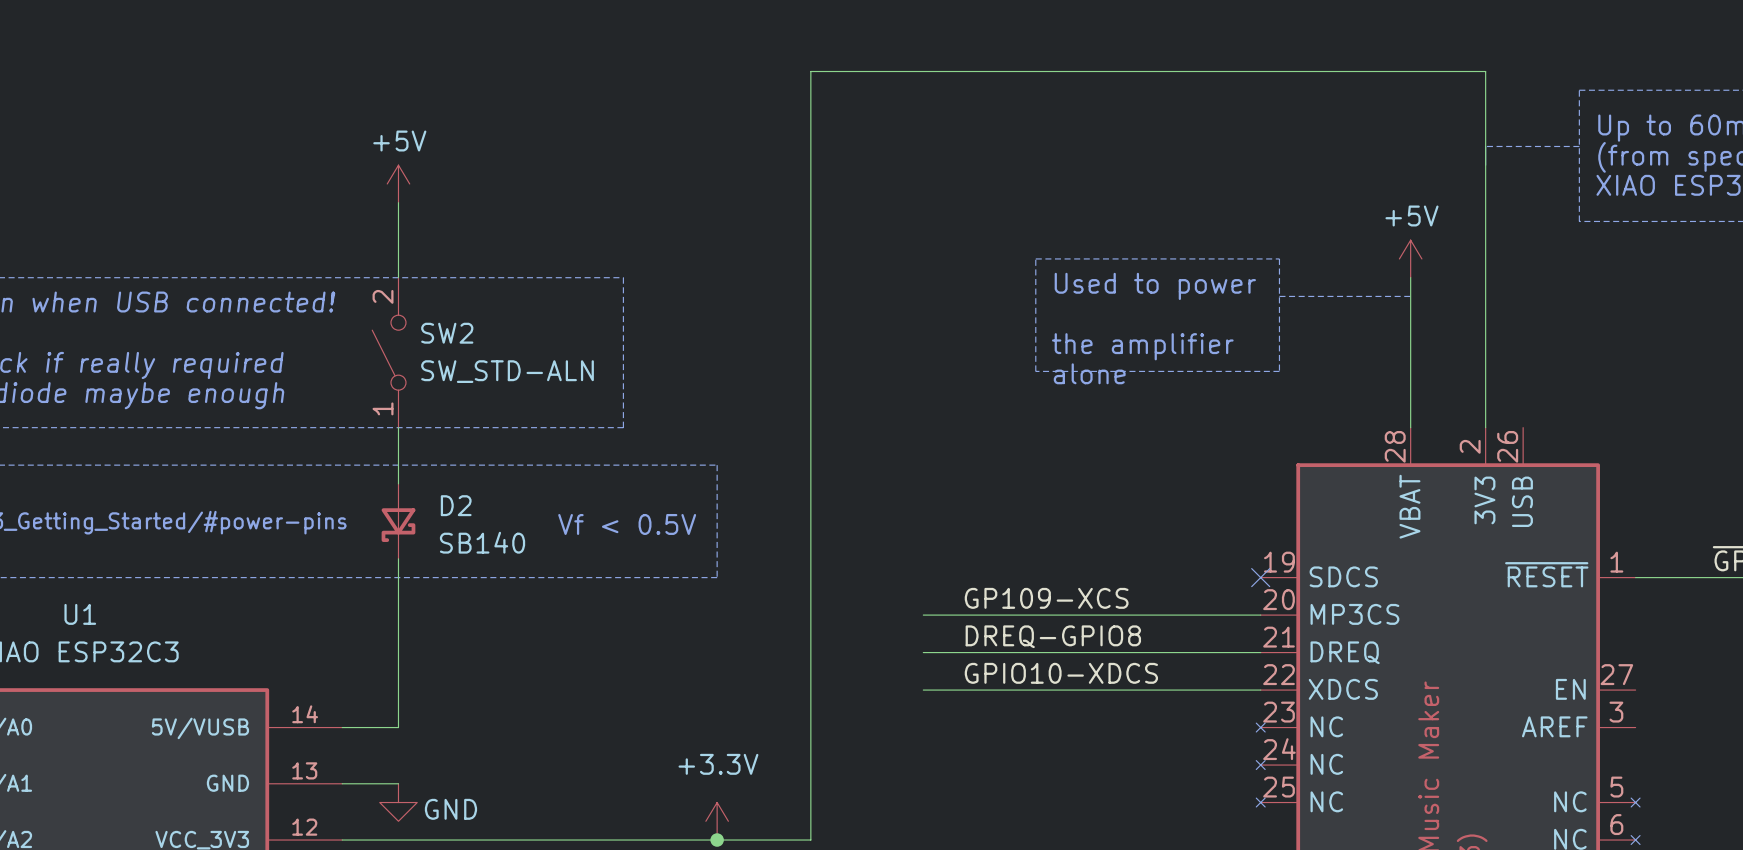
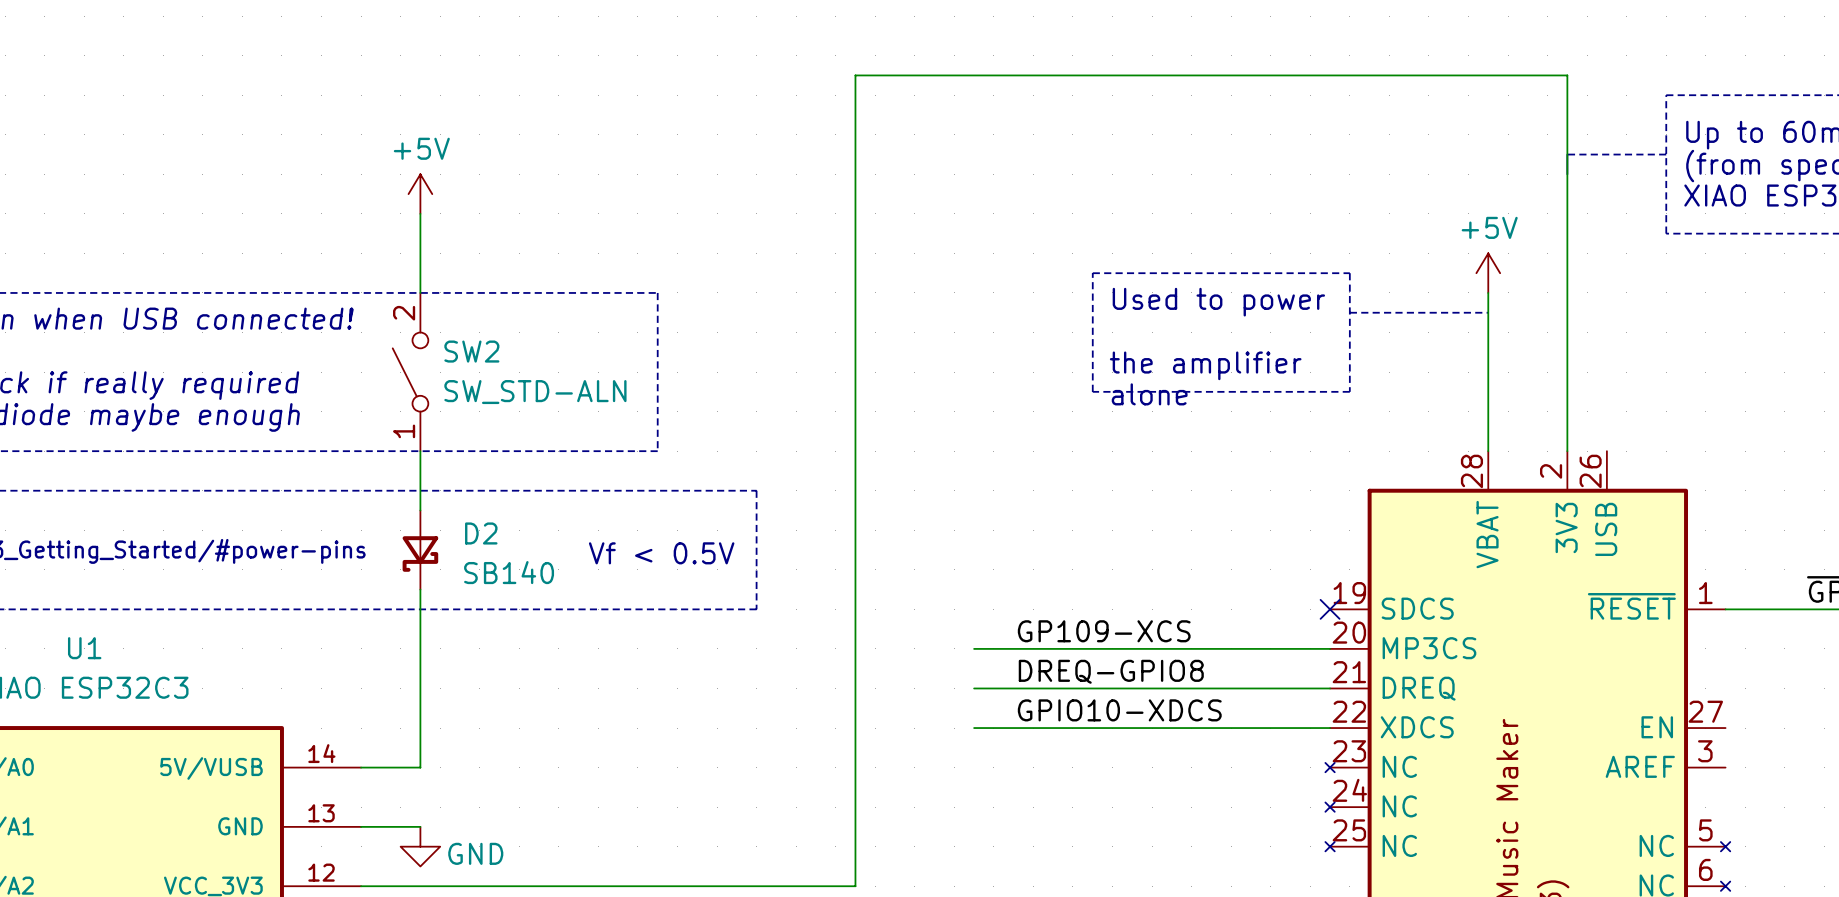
power symbol: +3.3V (717, 821) -> none
junction: (717, 840) -> none

